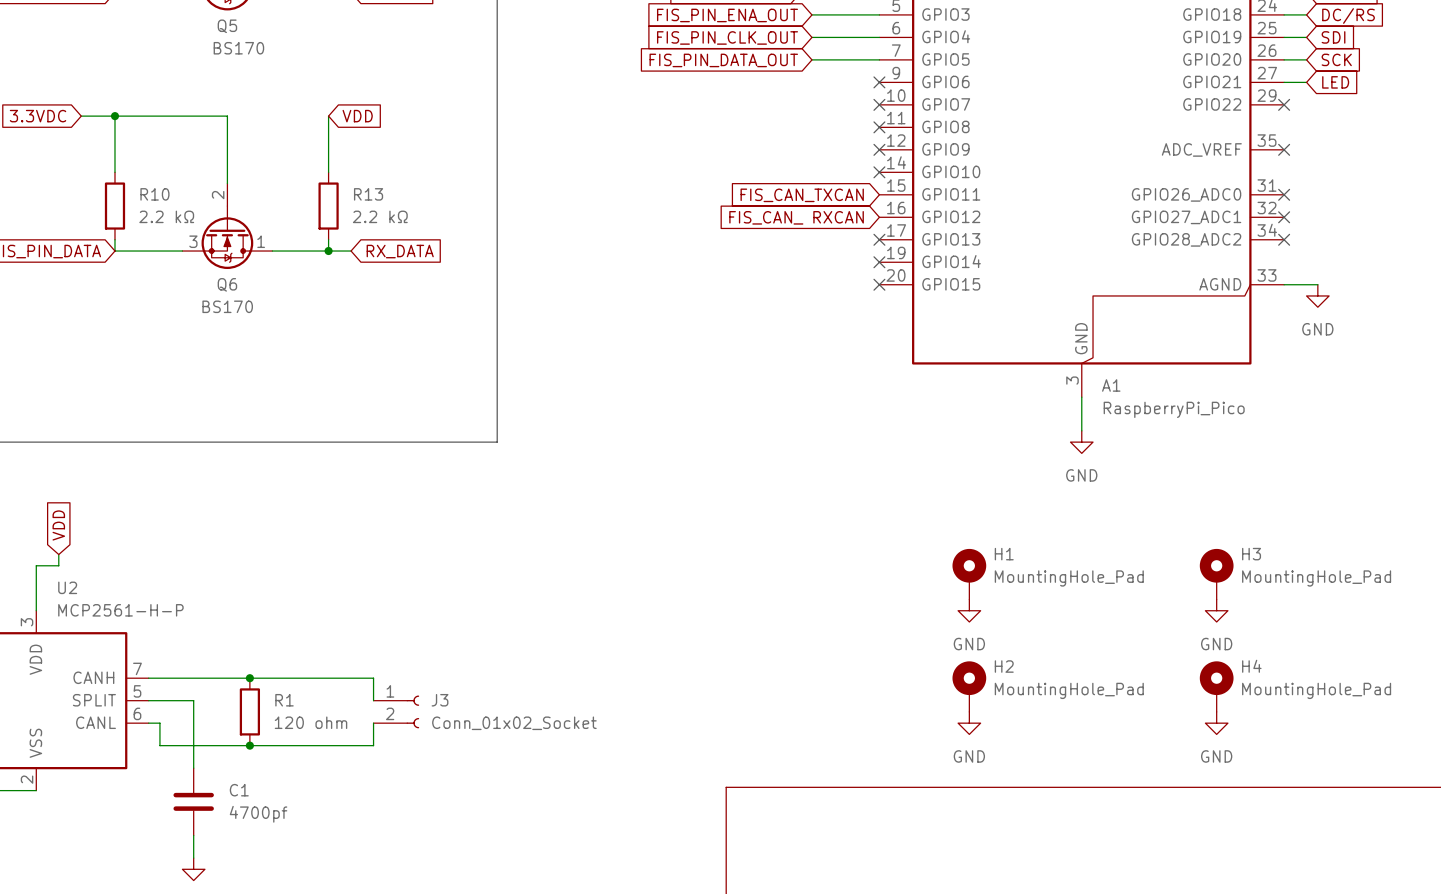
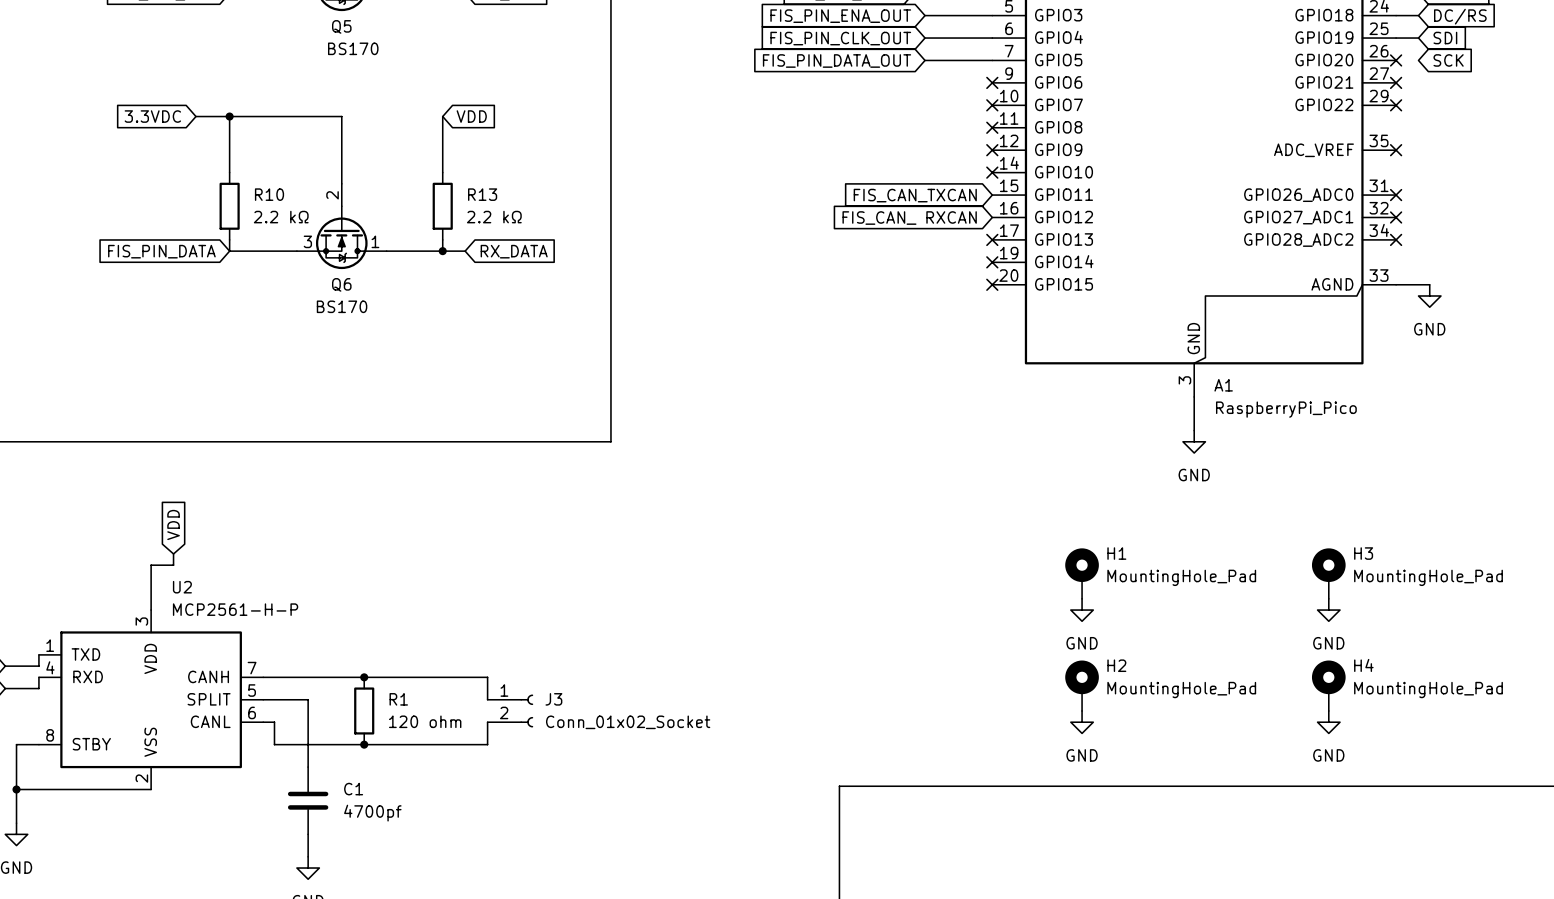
wire: (1284, 59) (1306, 59) -> none
no-connect mark: none -> (1396, 60)
wire: (1284, 82) (1306, 82) -> none
no-connect mark: none -> (1396, 82)
global label: LED (1335, 82) -> none

